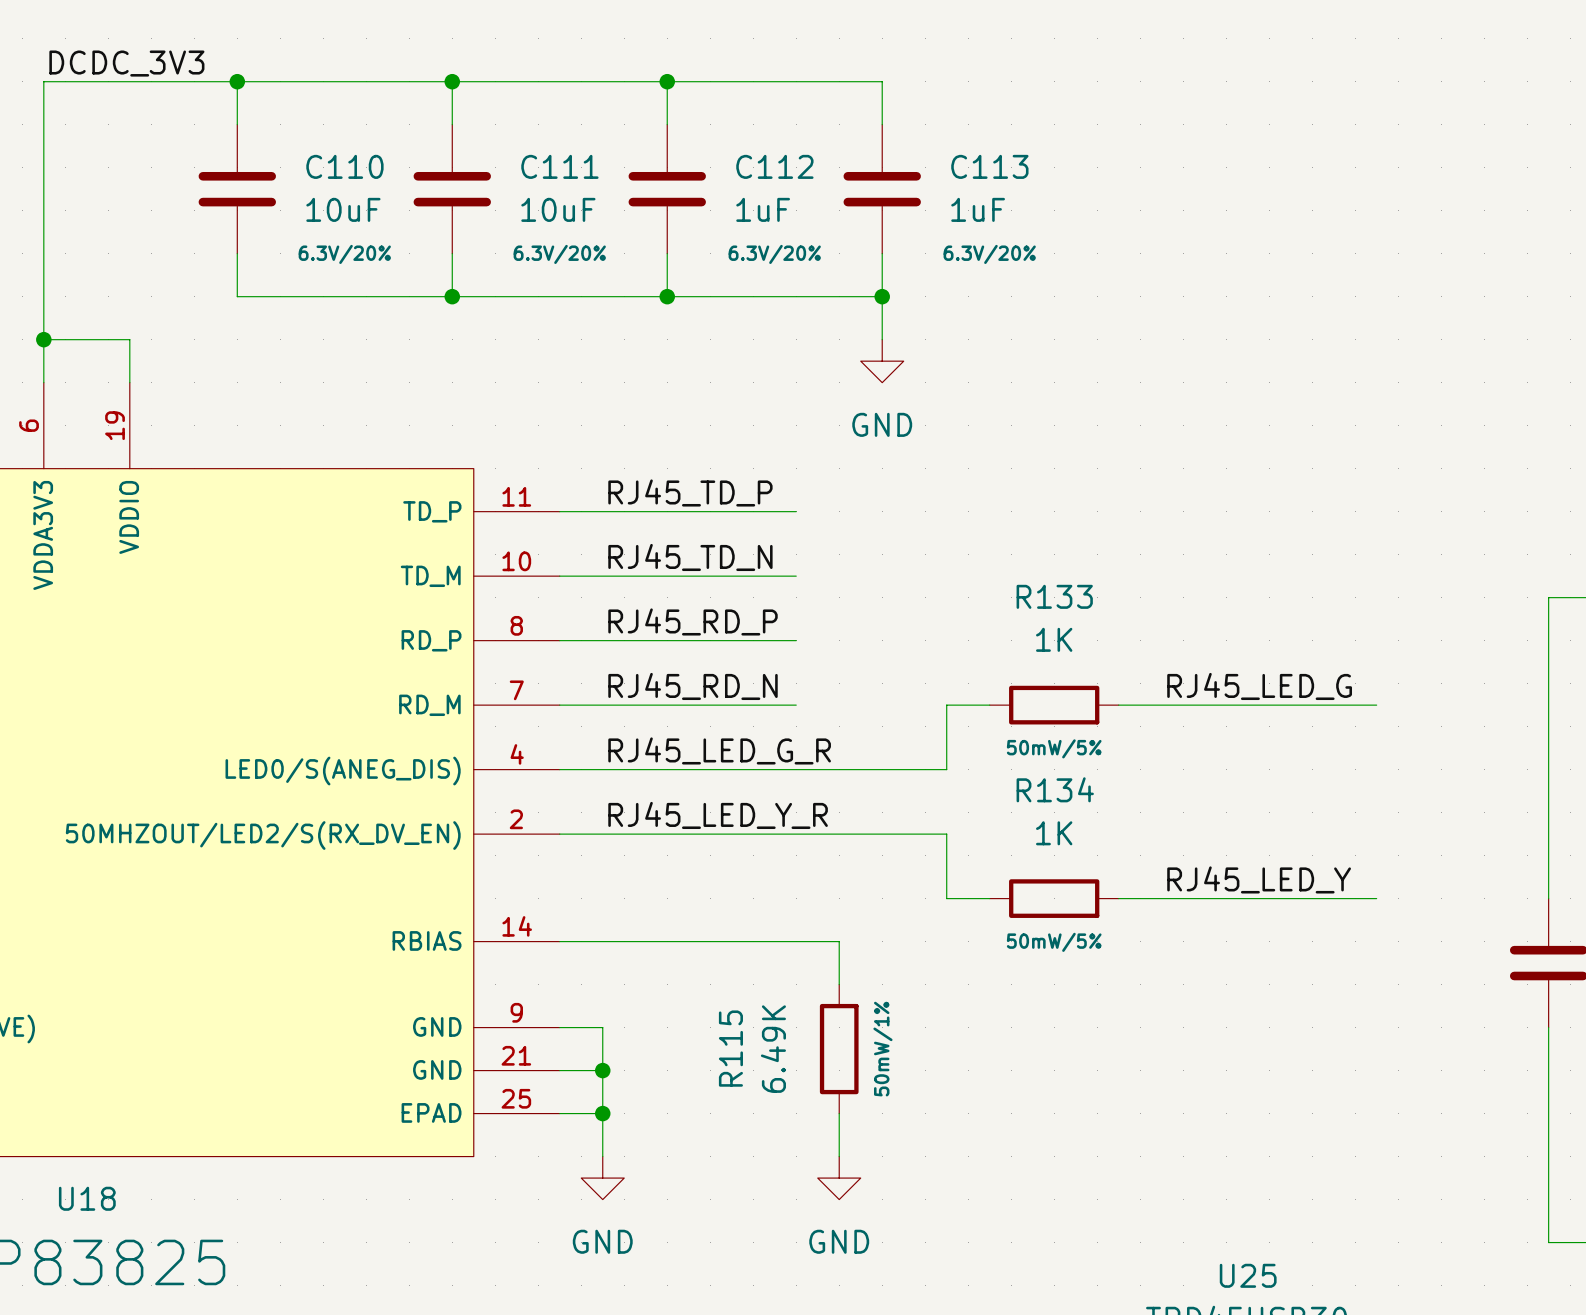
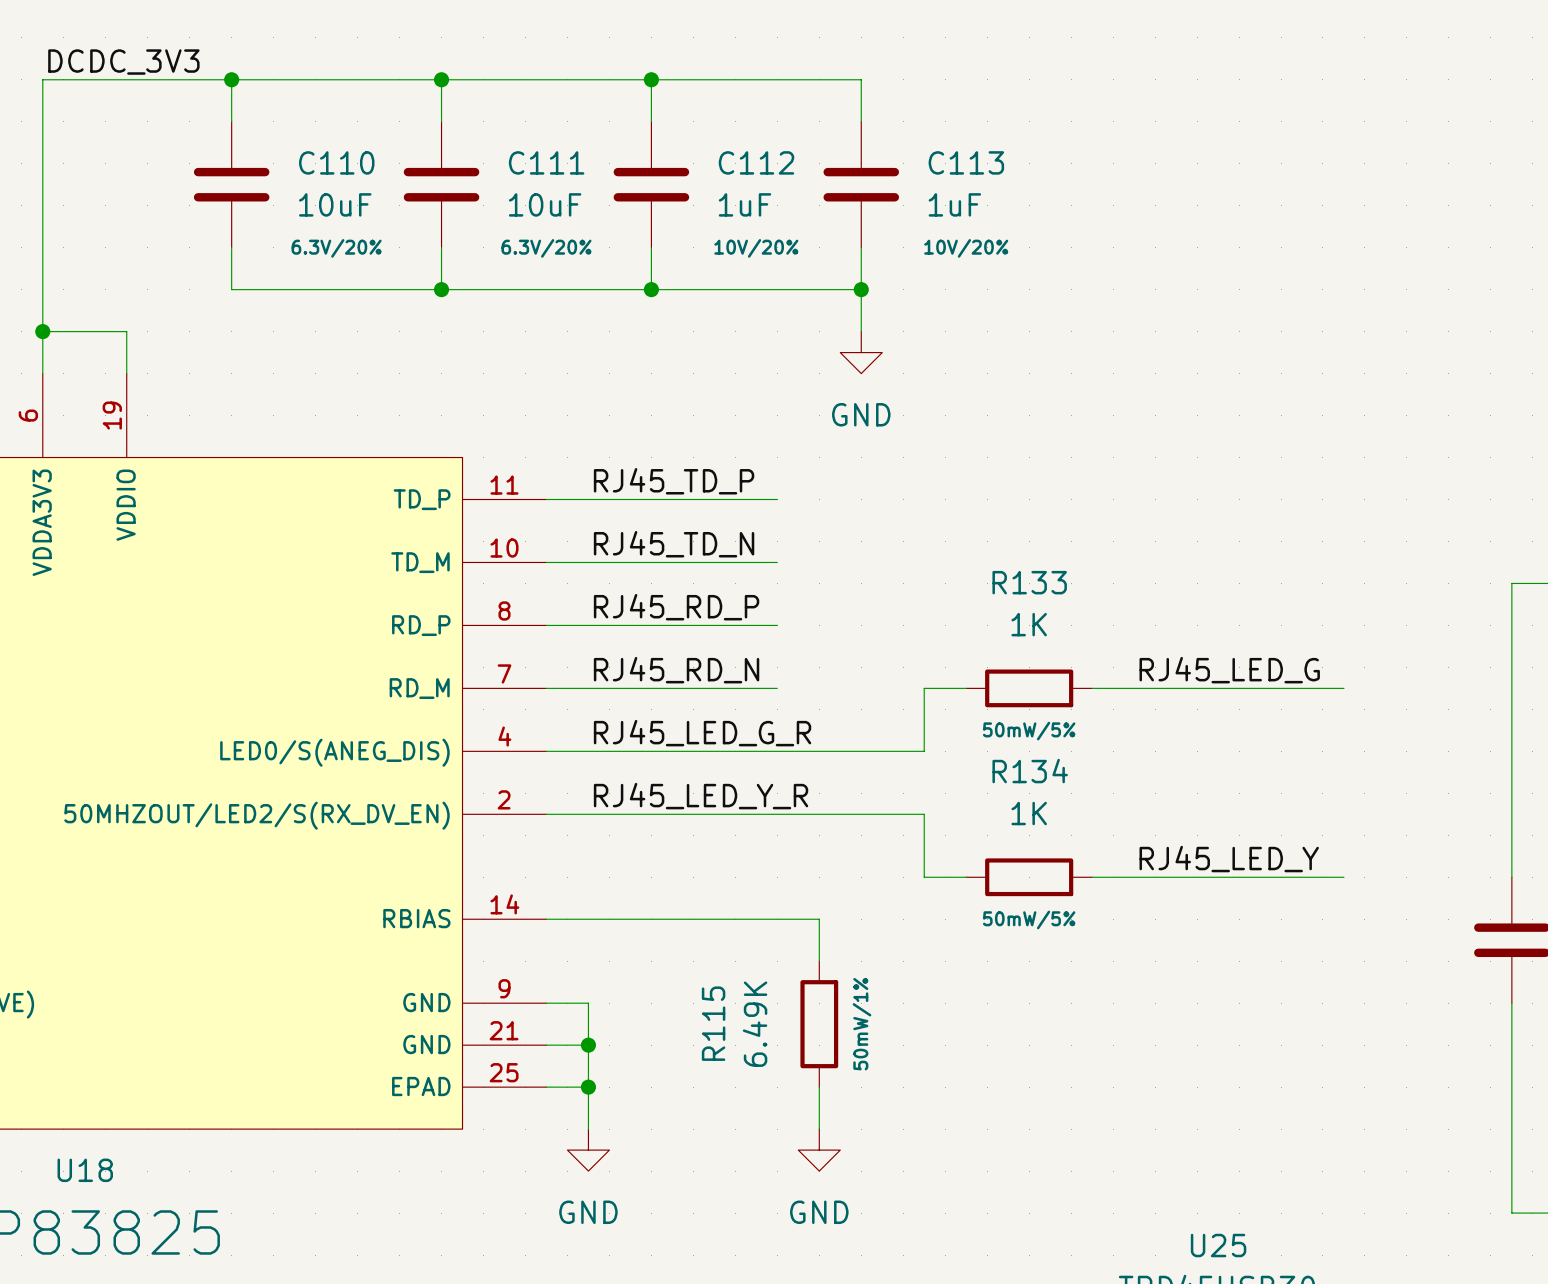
C112 text: 6.3V/20% (774, 254) -> 10V/20% (756, 248)
C113 text: 6.3V/20% (989, 254) -> 10V/20% (966, 248)

